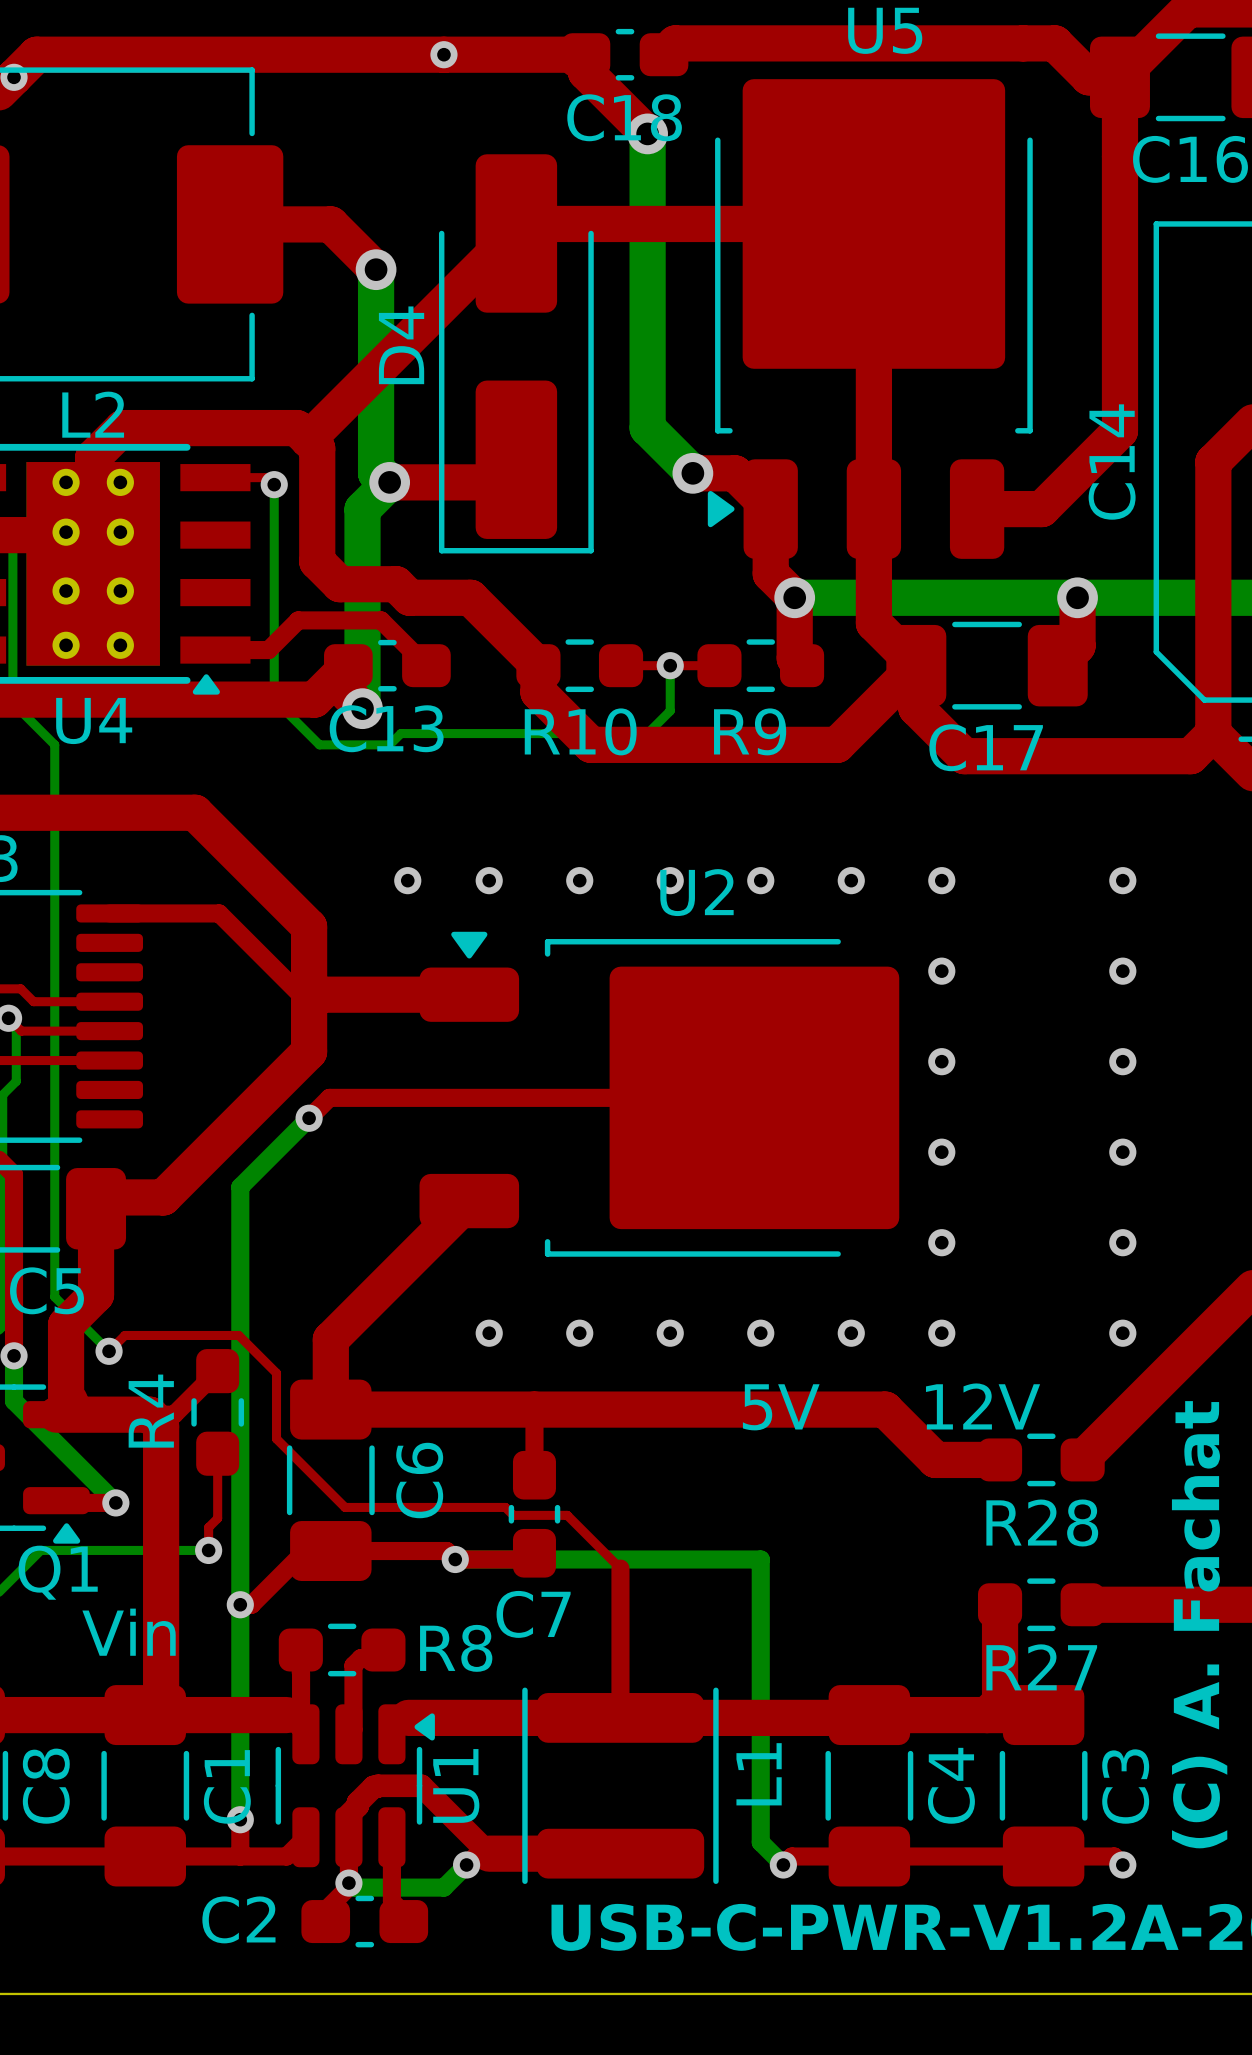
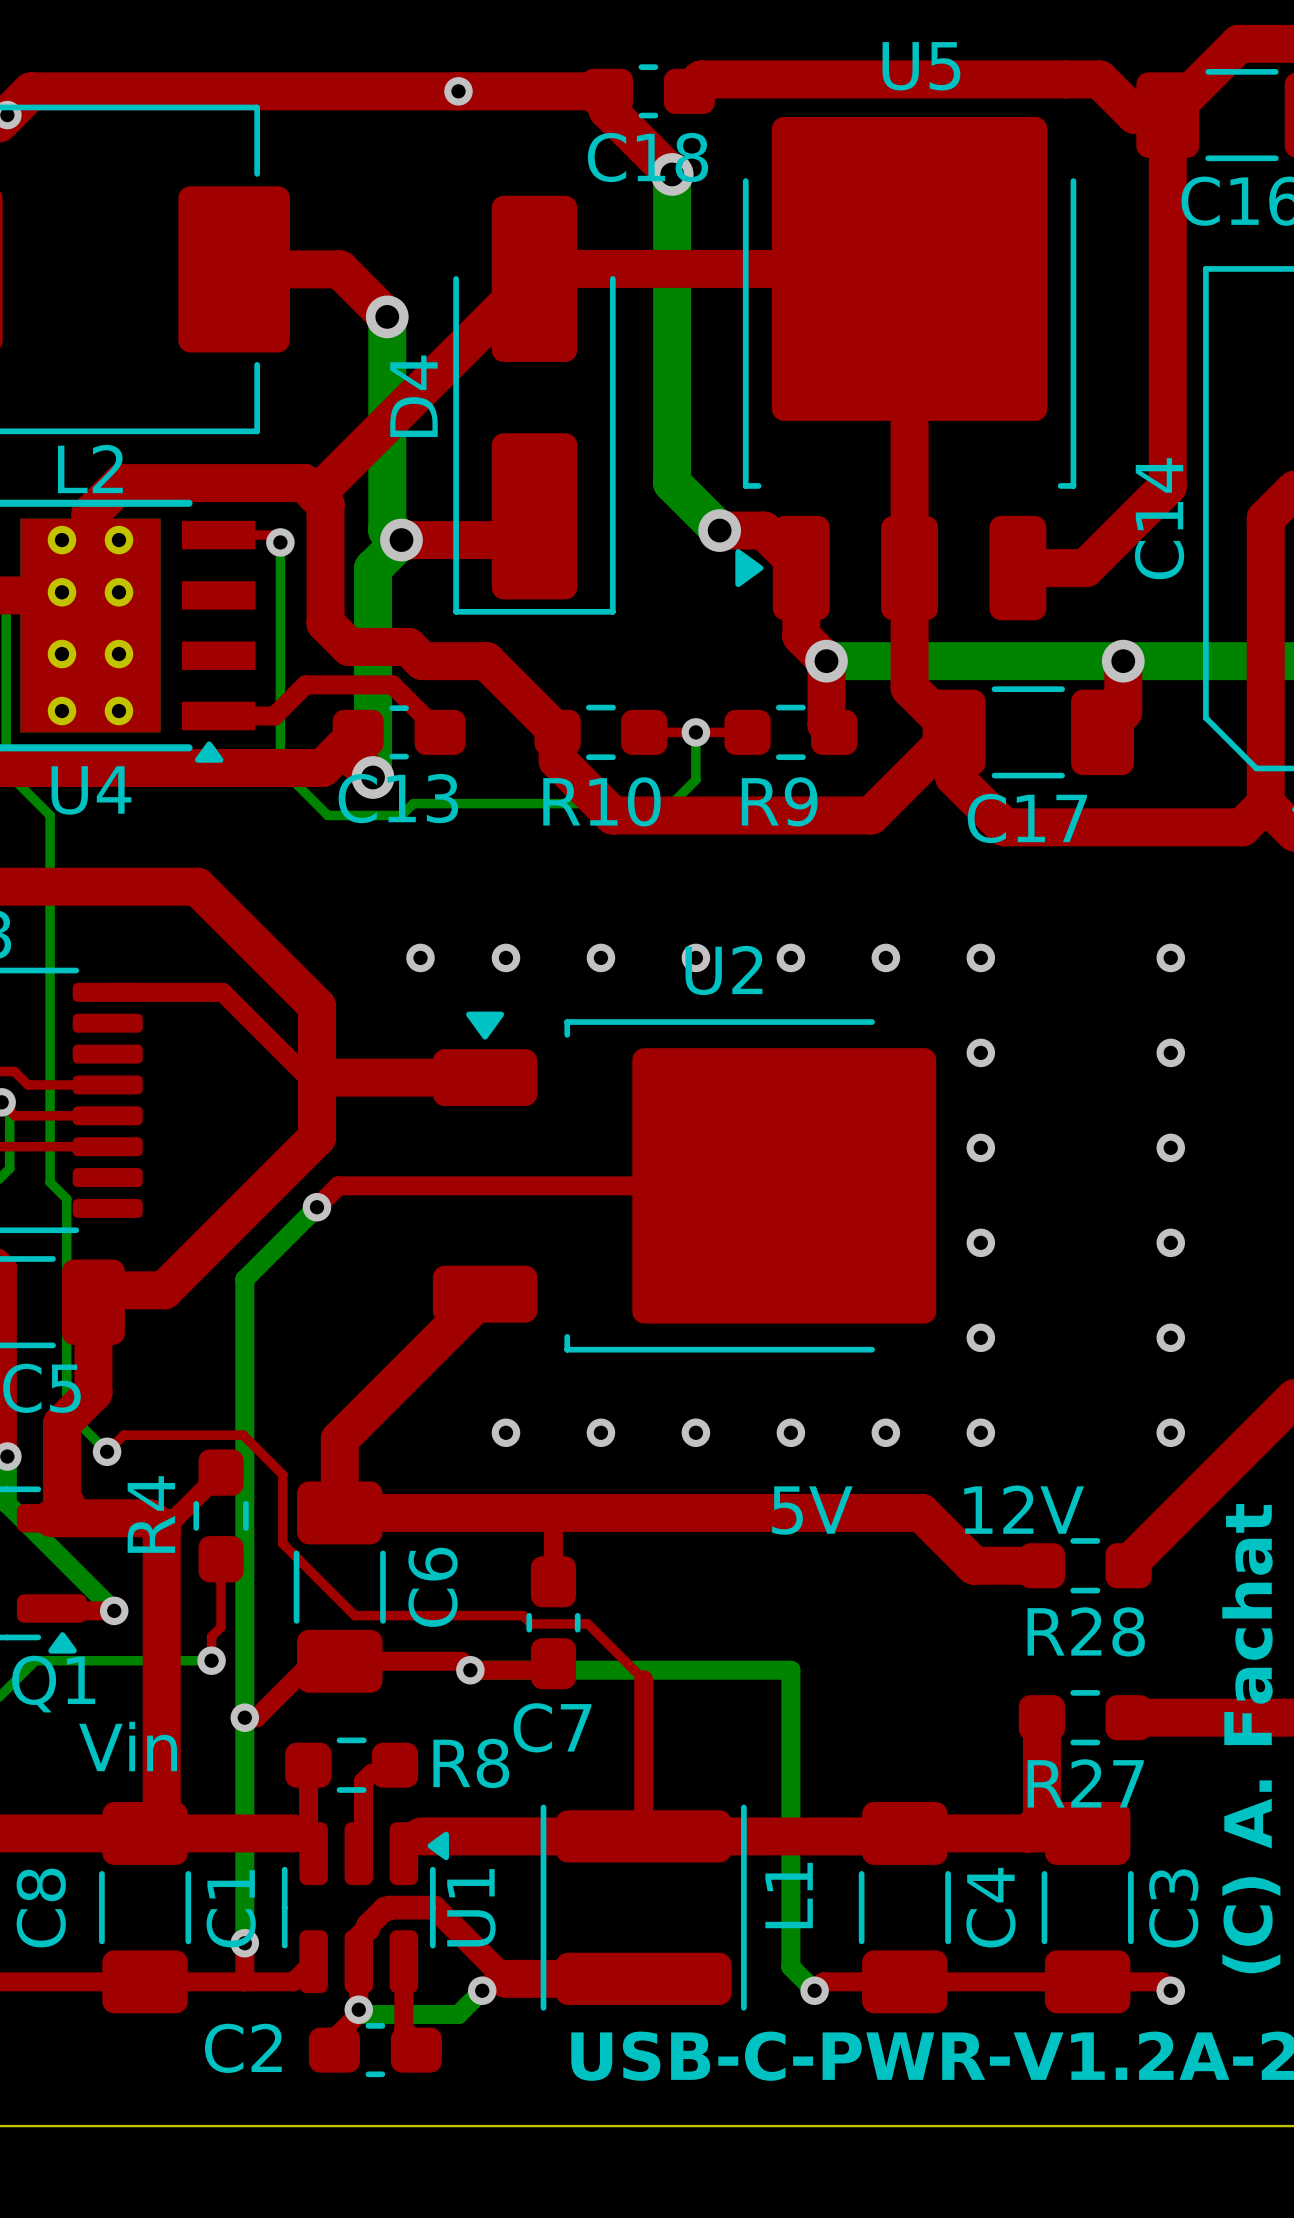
bottom track: (54, 1094) (54, 1297) (70, 1312) -> (50, 1182) (66, 1198) (66, 1411)

